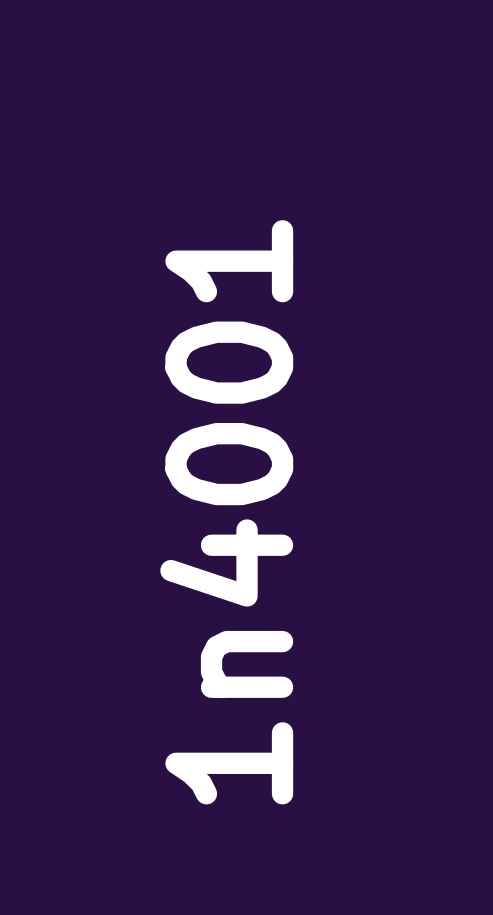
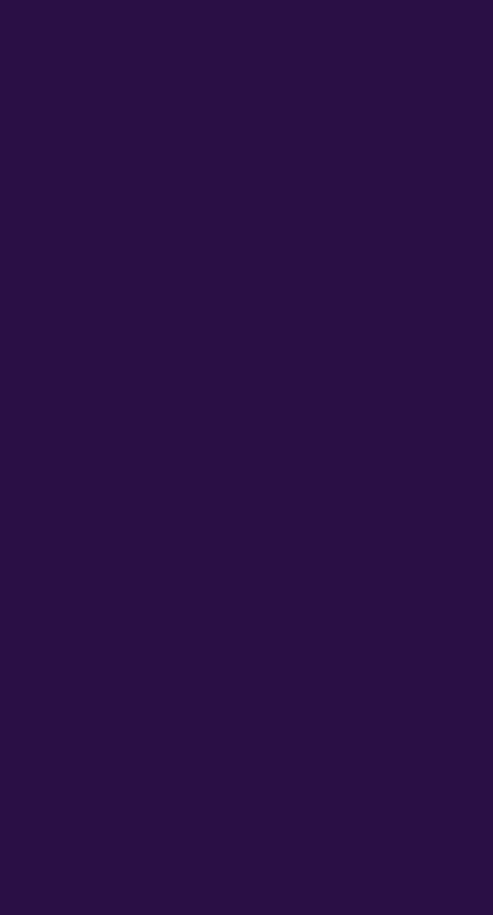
text: 1n4001 (226, 512) -> none

